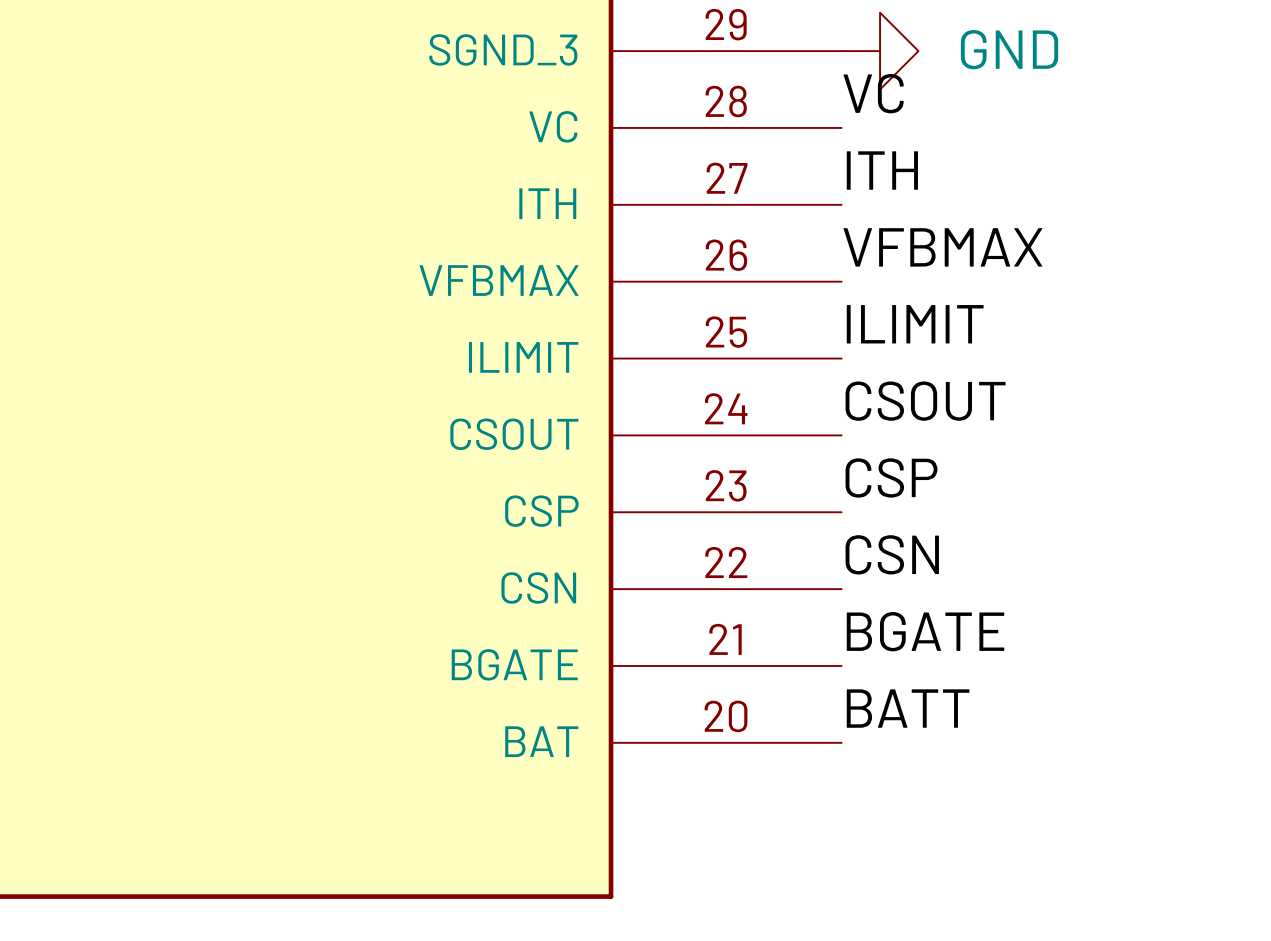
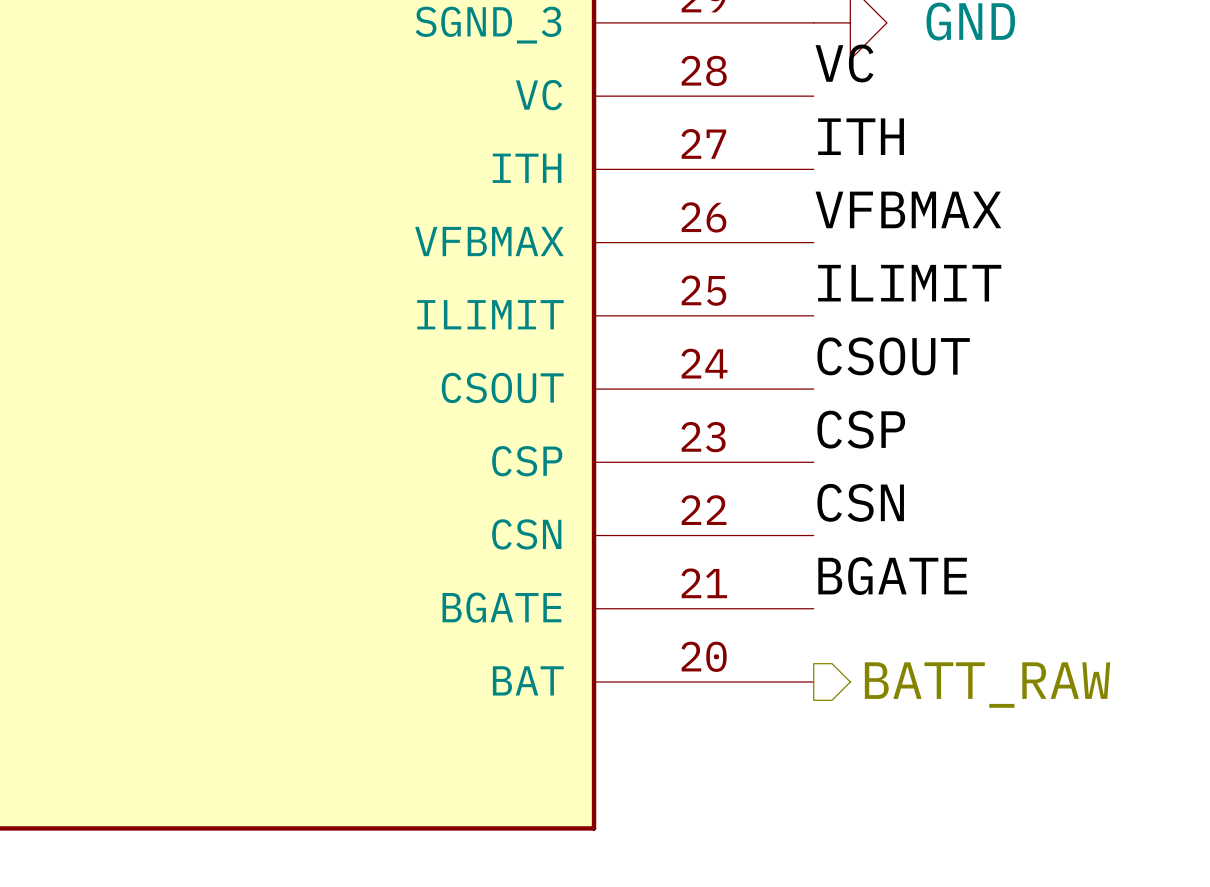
label: BATT (908, 708) -> none
hierarchical label: none -> BATT_RAW (987, 685)

